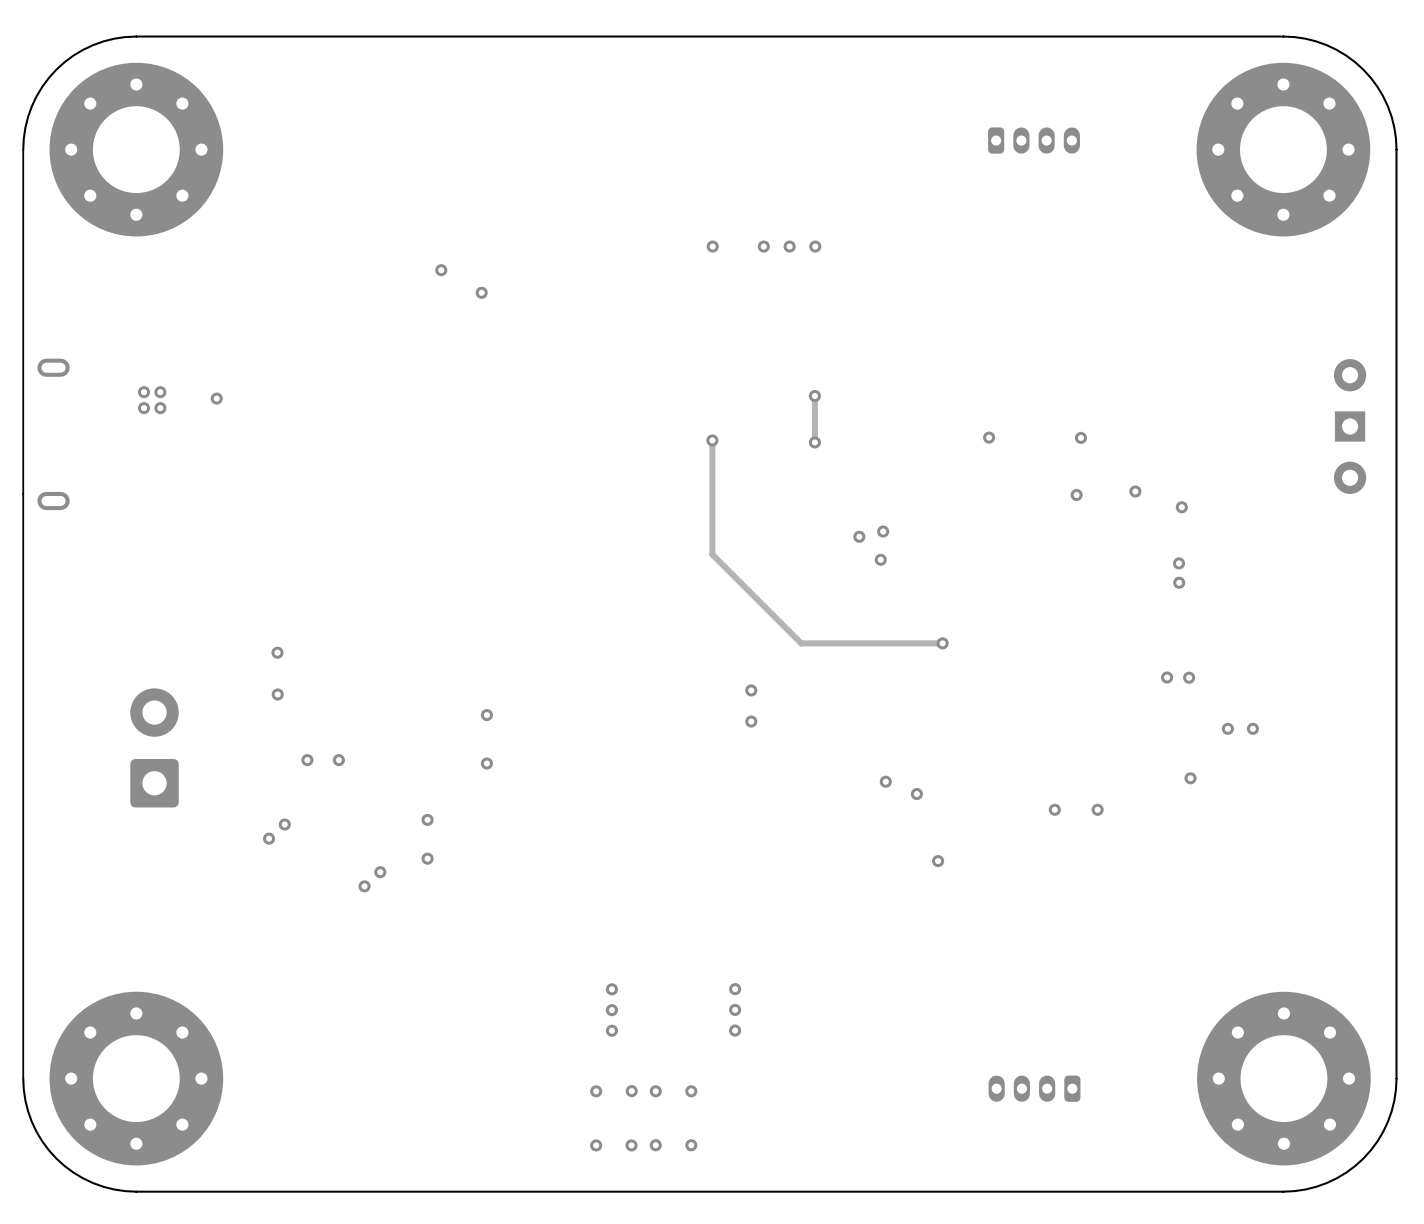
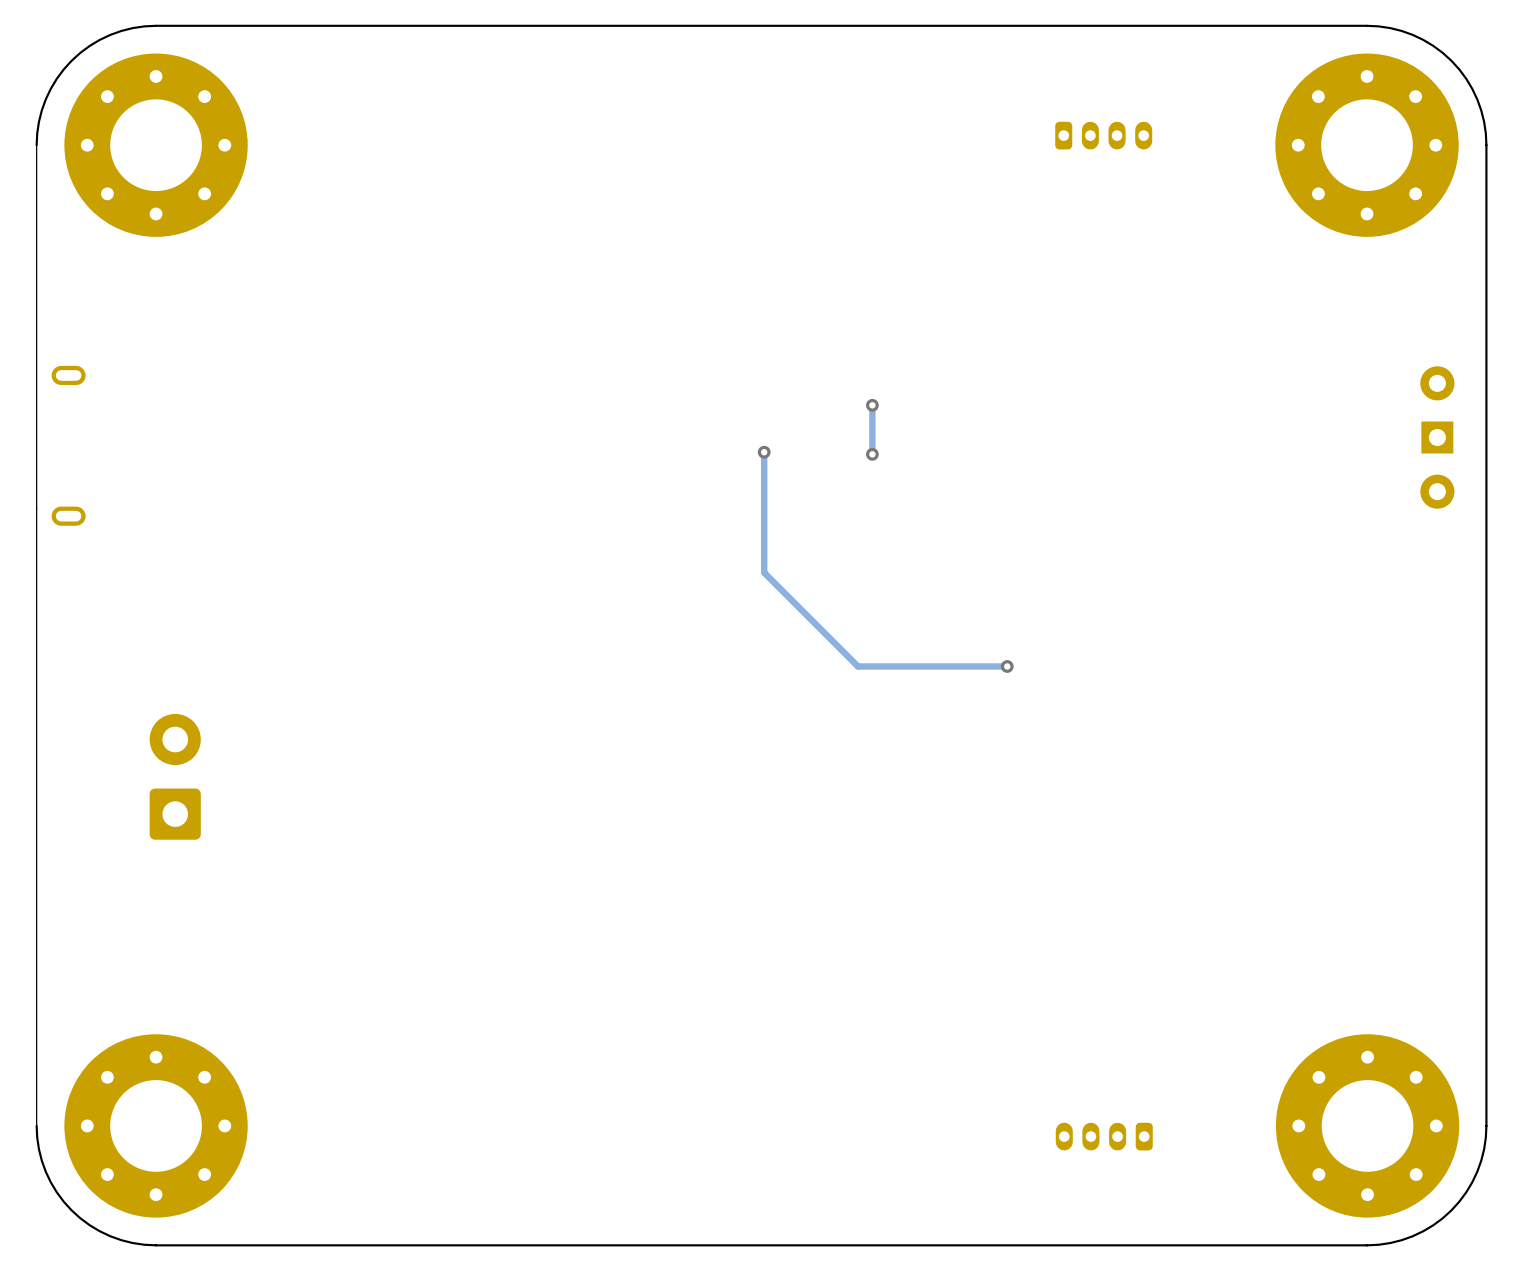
via: (712, 246) -> none
via: (763, 246) -> none
via: (789, 246) -> none
via: (815, 246) -> none
via: (441, 270) -> none
via: (481, 292) -> none
via: (144, 392) -> none
via: (160, 392) -> none
via: (216, 398) -> none
via: (144, 408) -> none
via: (160, 408) -> none
via: (989, 437) -> none
via: (1080, 437) -> none
via: (1135, 491) -> none
via: (1076, 494) -> none
via: (1181, 507) -> none
via: (883, 531) -> none
via: (859, 536) -> none
via: (880, 559) -> none
via: (1179, 563) -> none
via: (1179, 582) -> none
via: (277, 652) -> none
via: (1167, 677) -> none
via: (1189, 677) -> none
via: (751, 690) -> none
via: (277, 694) -> none
via: (486, 715) -> none
via: (751, 721) -> none
via: (1227, 728) -> none
via: (1252, 728) -> none
via: (307, 760) -> none
via: (338, 760) -> none
via: (486, 763) -> none
via: (1190, 778) -> none
via: (885, 781) -> none
via: (916, 794) -> none
via: (1054, 809) -> none
via: (1097, 809) -> none
via: (427, 819) -> none
via: (284, 824) -> none
via: (269, 838) -> none
via: (427, 858) -> none
via: (938, 861) -> none
via: (380, 872) -> none
via: (364, 886) -> none
via: (611, 989) -> none
via: (735, 989) -> none
via: (735, 1009) -> none
via: (611, 1010) -> none
via: (611, 1030) -> none
via: (735, 1030) -> none
via: (596, 1091) -> none
via: (631, 1091) -> none
via: (655, 1091) -> none
via: (691, 1091) -> none
via: (596, 1145) -> none
via: (631, 1145) -> none
via: (655, 1145) -> none
via: (691, 1145) -> none

